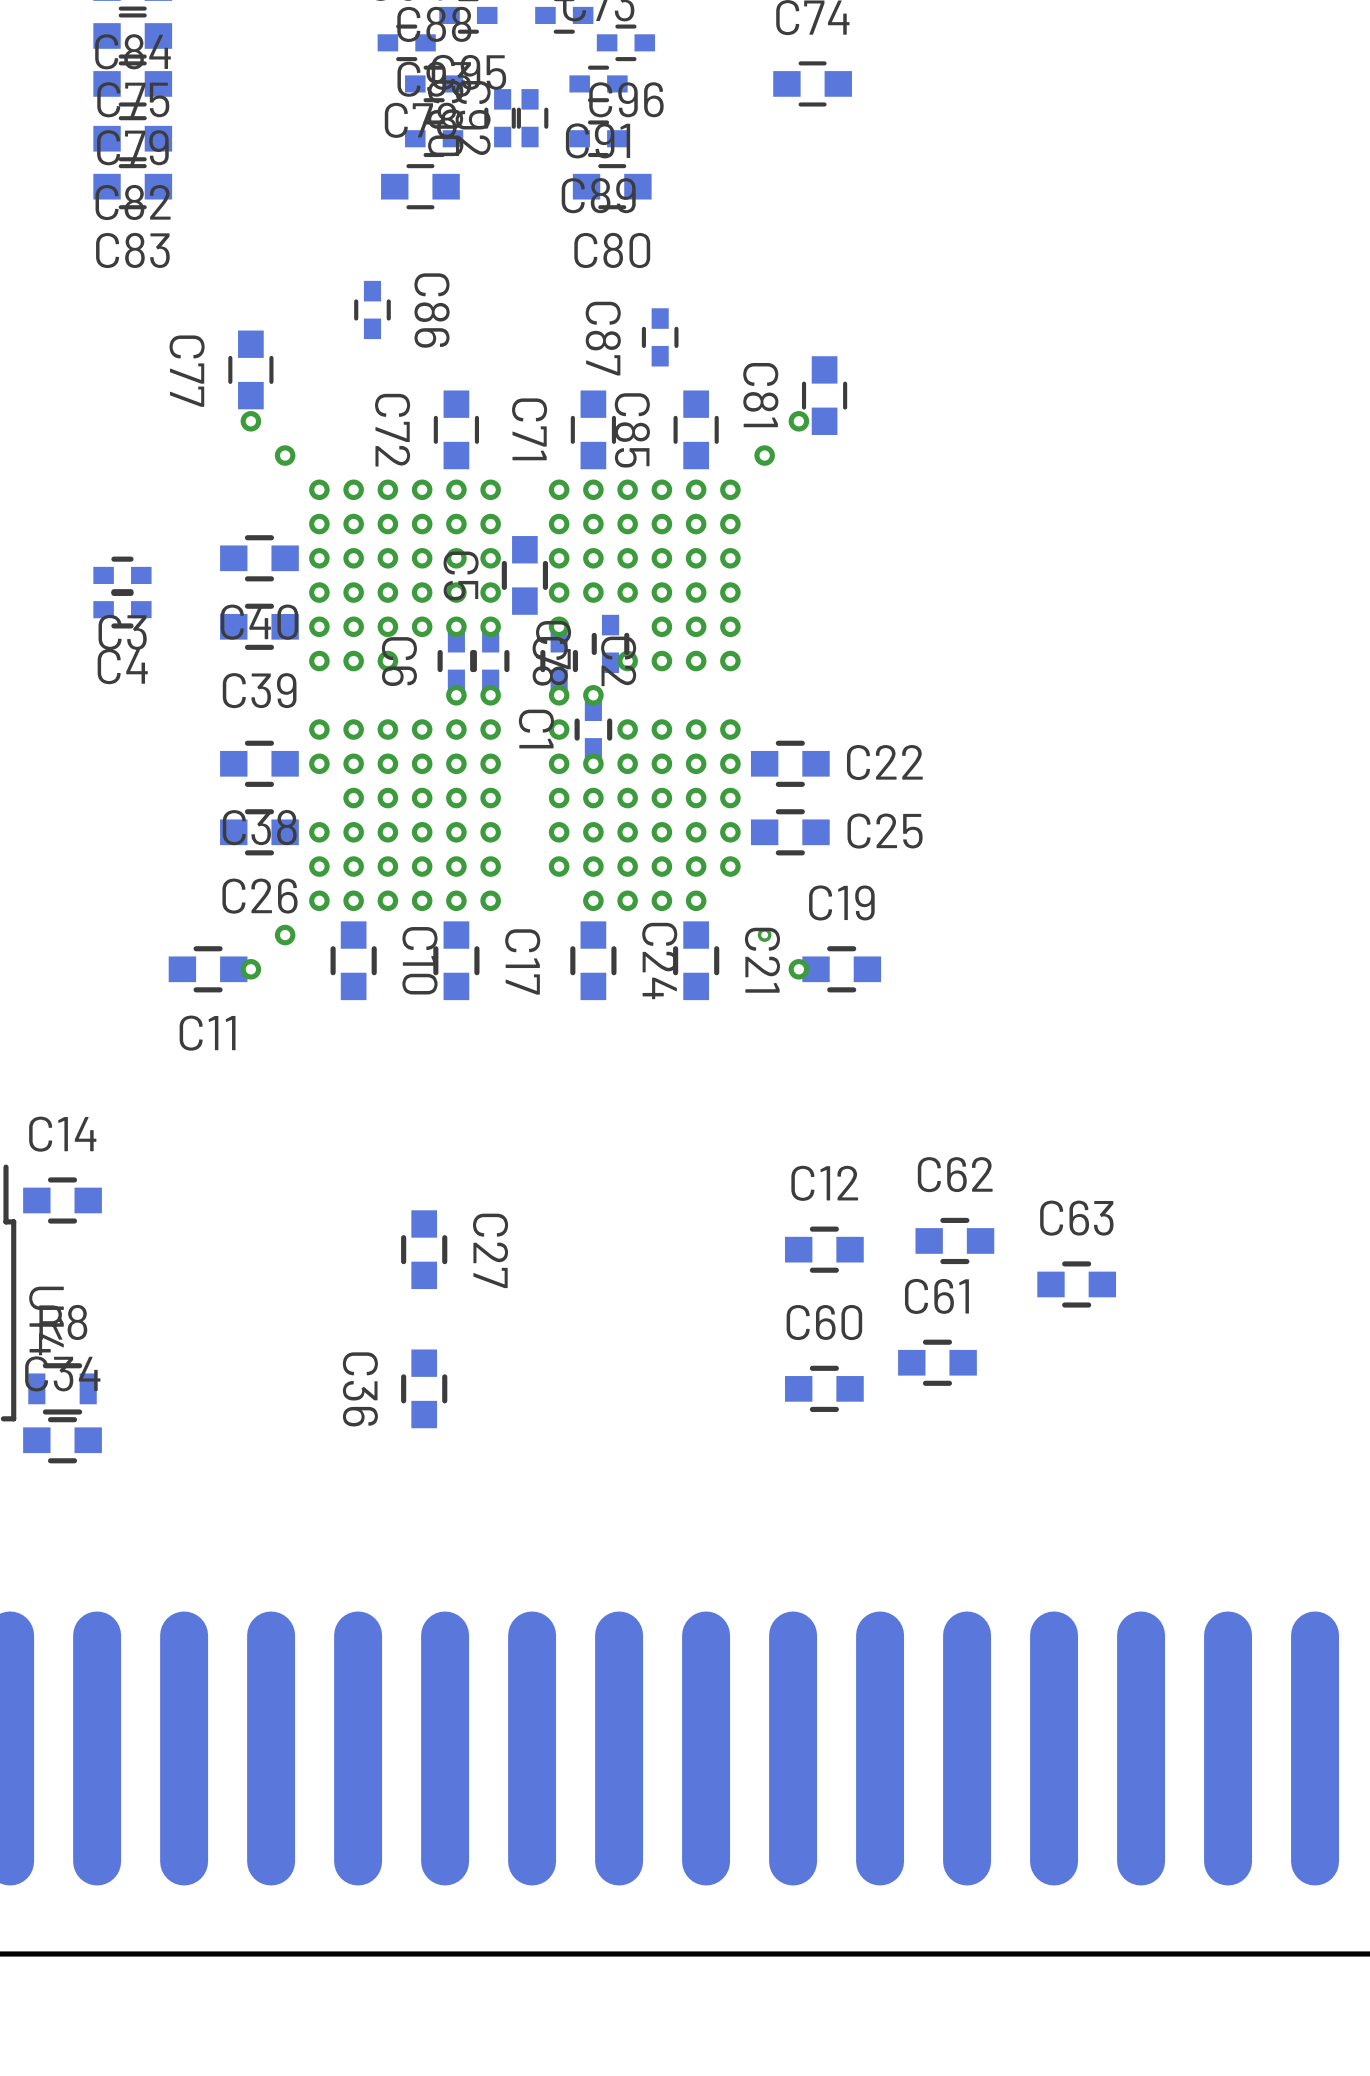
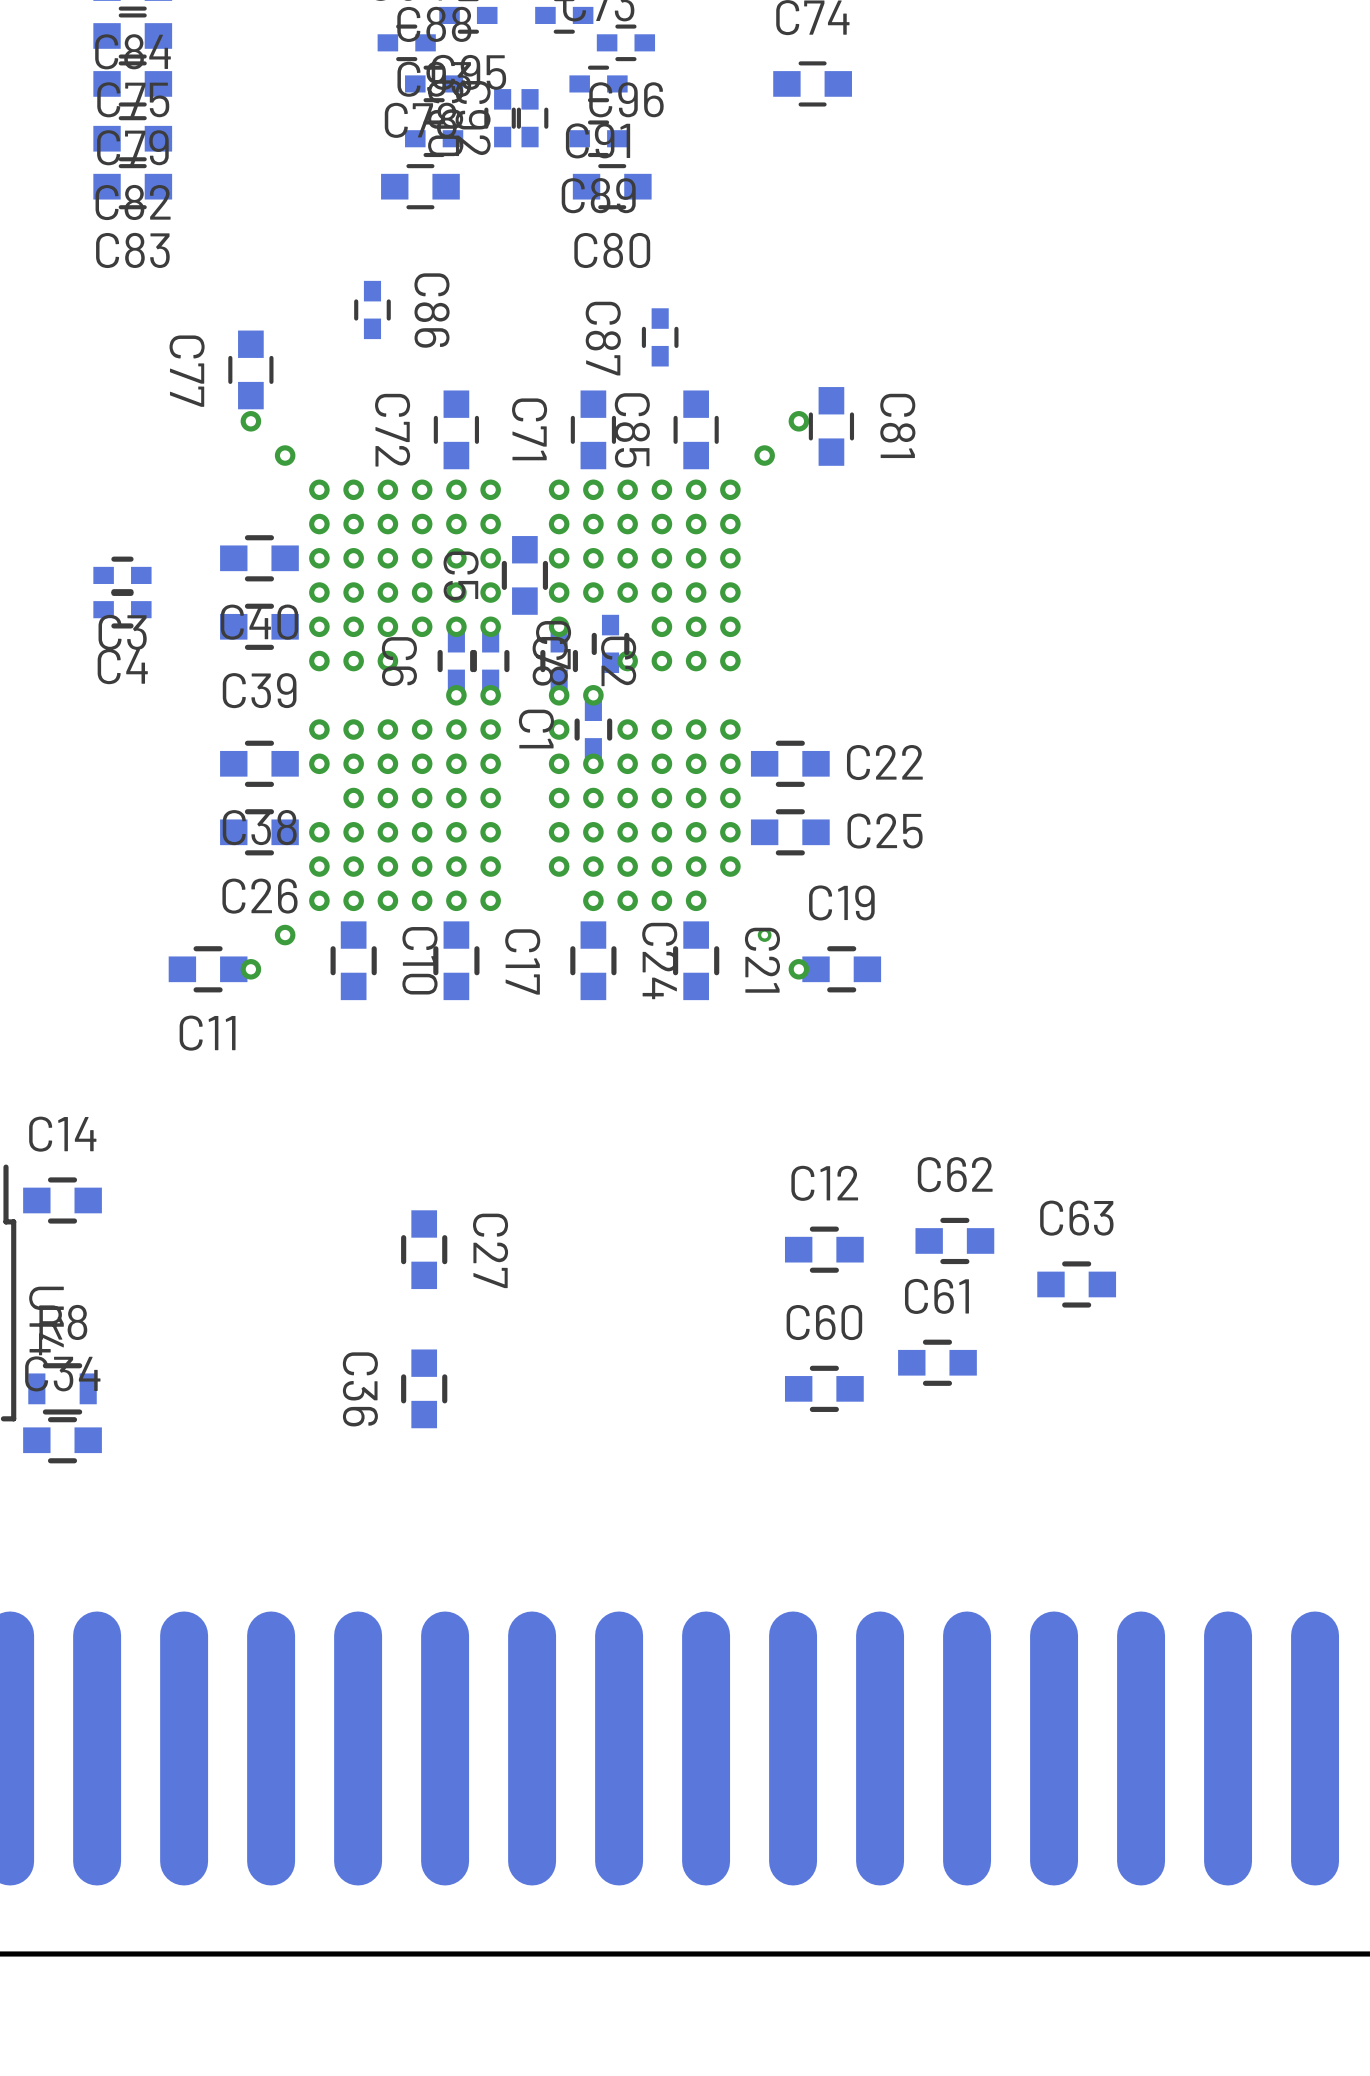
C81 name position: C81 (760, 395) -> C81 (897, 425)
C81 position: (824, 395) -> (831, 426)

